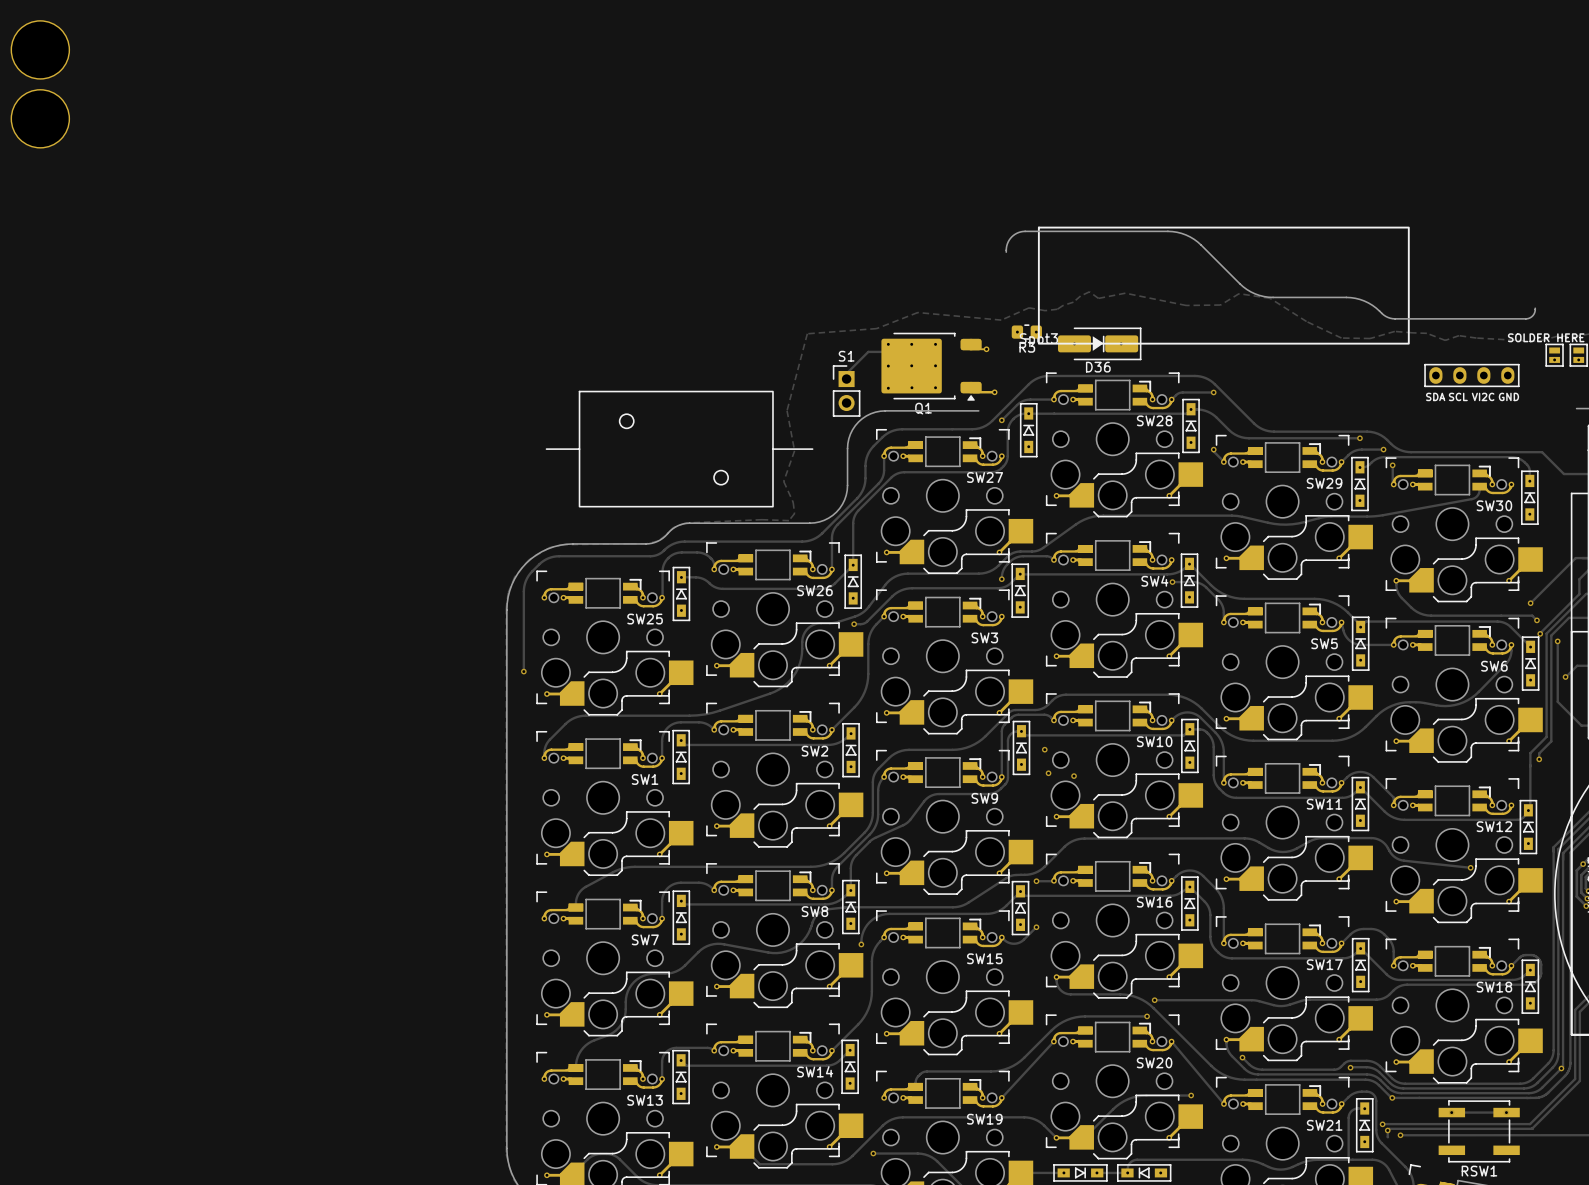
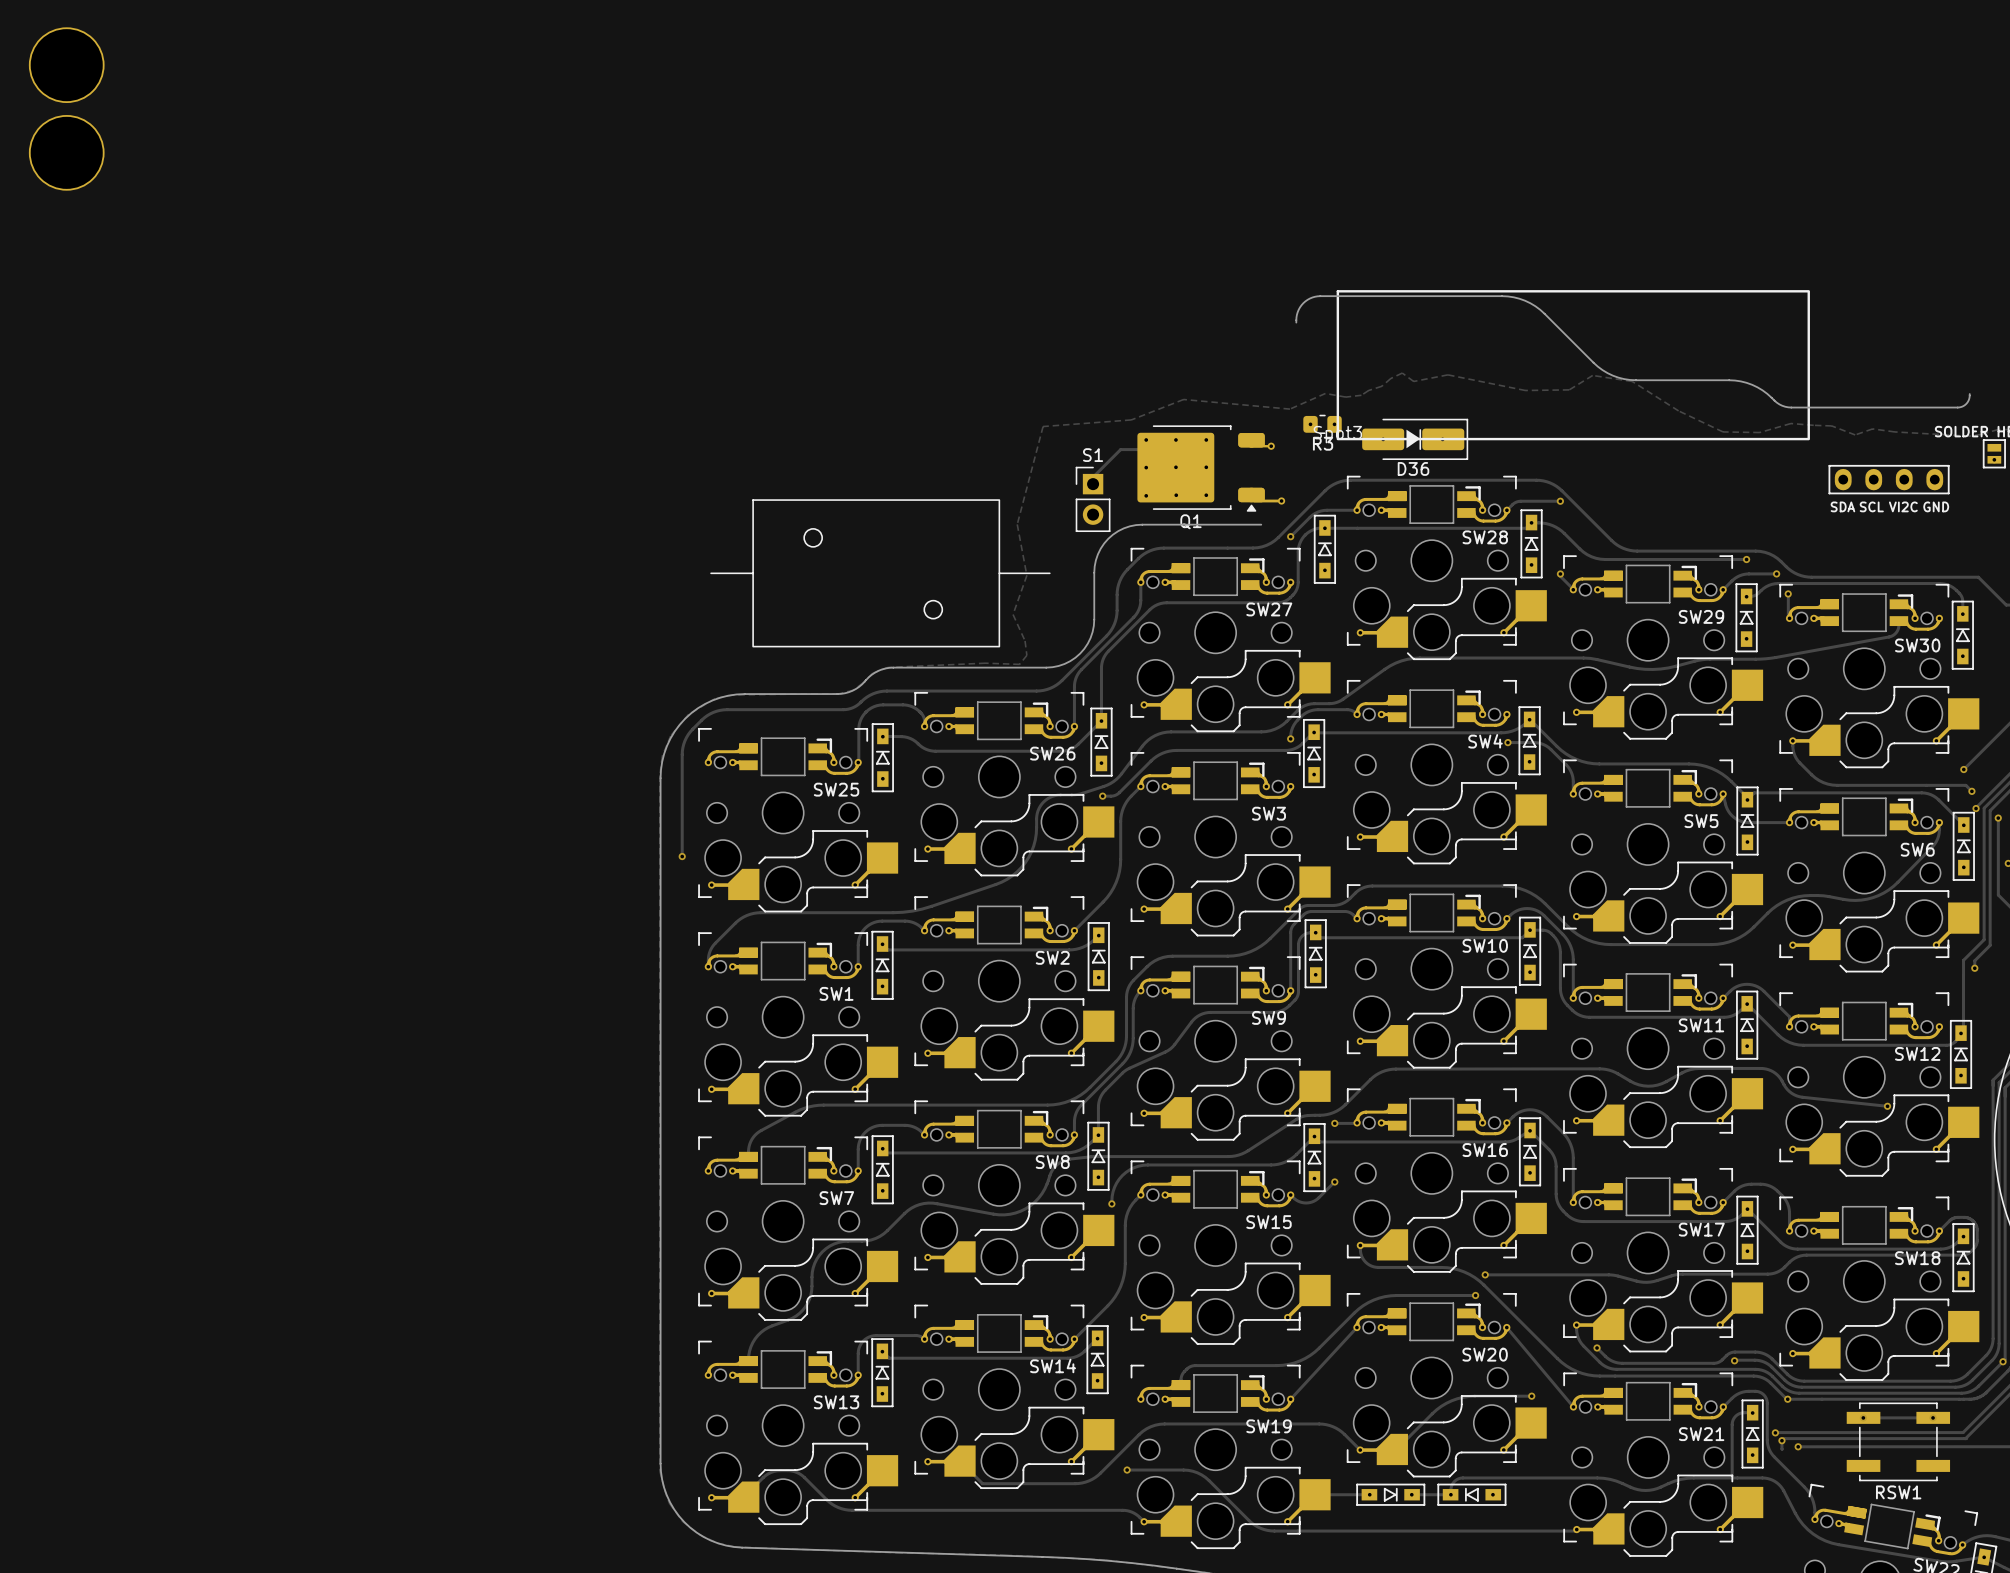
via: (1044, 749) -> none
via: (1048, 773) -> none
via: (1074, 776) -> none

